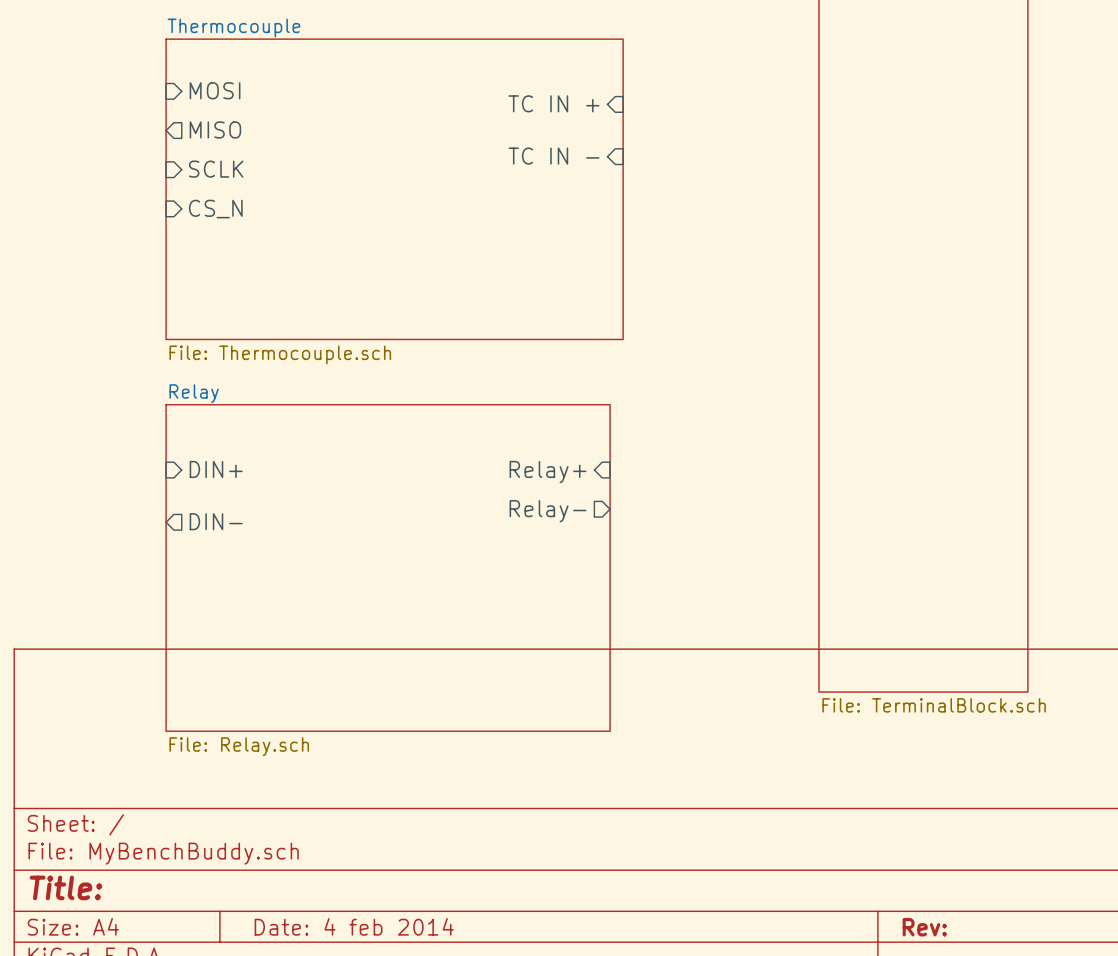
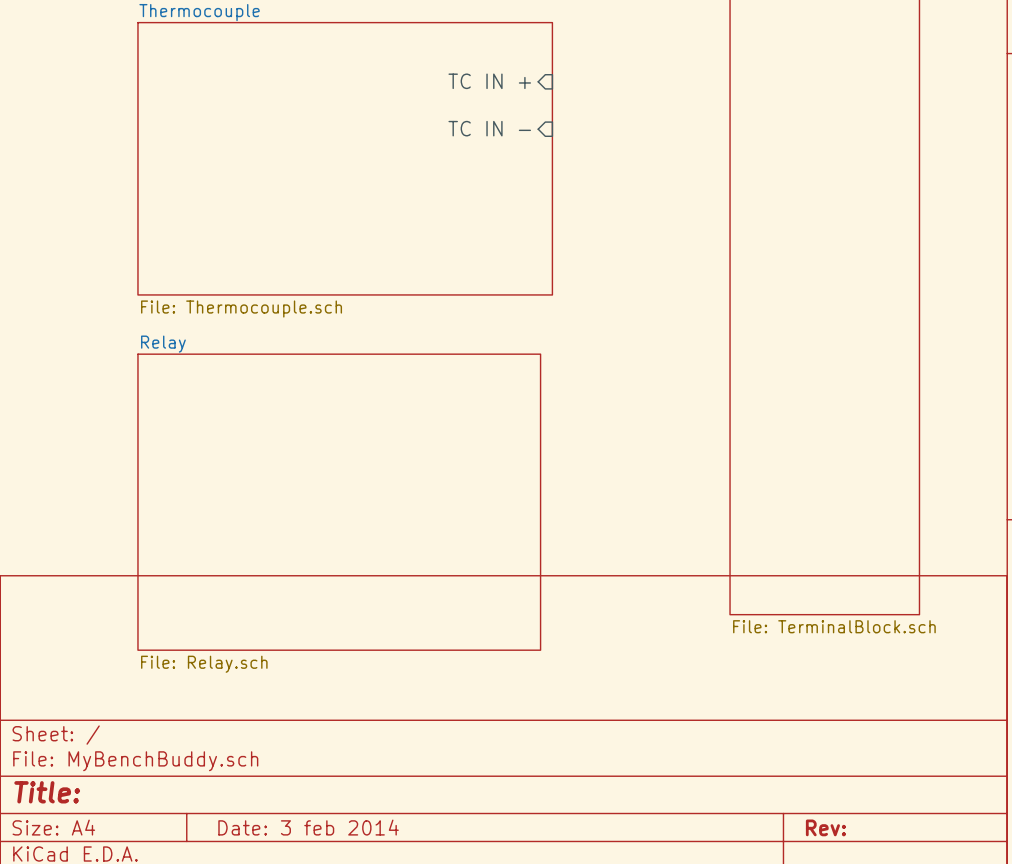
sheet pin: MOSI (215, 90) -> none
sheet pin: MISO (215, 129) -> none
sheet pin: SCLK (216, 169) -> none
sheet pin: CS_N (215, 209) -> none
sheet pin: DIN+ (216, 469) -> none
sheet pin: Relay+ (548, 472) -> none
sheet pin: Relay- (548, 511) -> none
sheet pin: DIN- (216, 521) -> none
title block: Date: 4 feb 2014 (354, 926) -> Date: 3 feb 2014 (308, 827)

